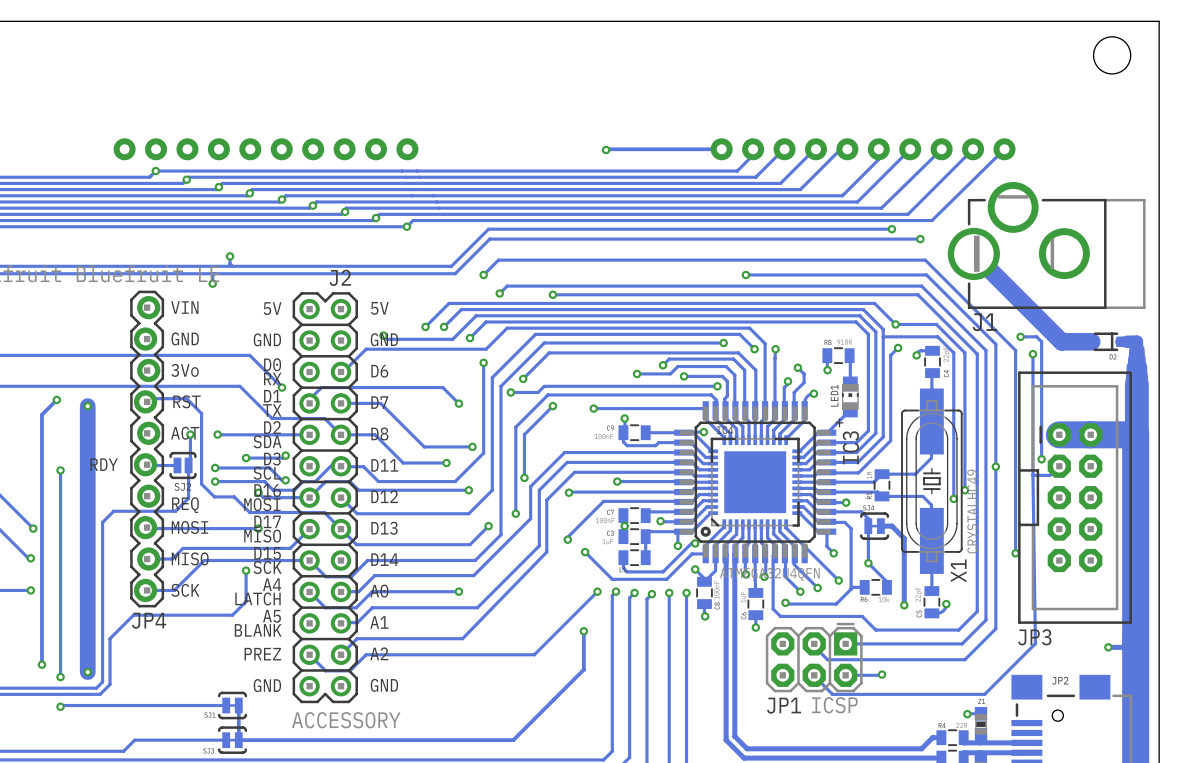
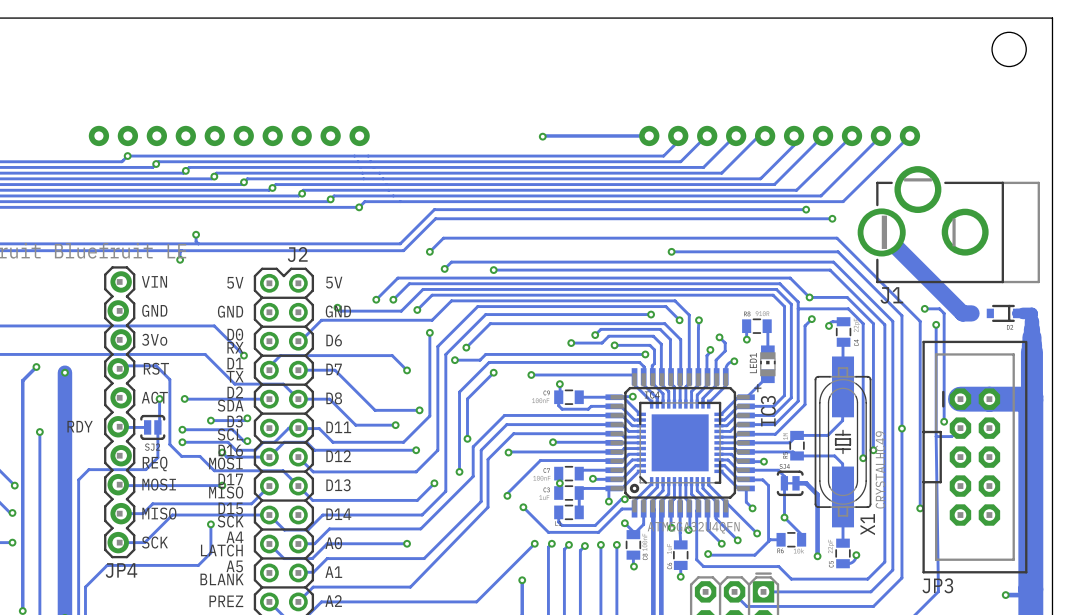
track: (1091, 341) (1071, 341) -> none

